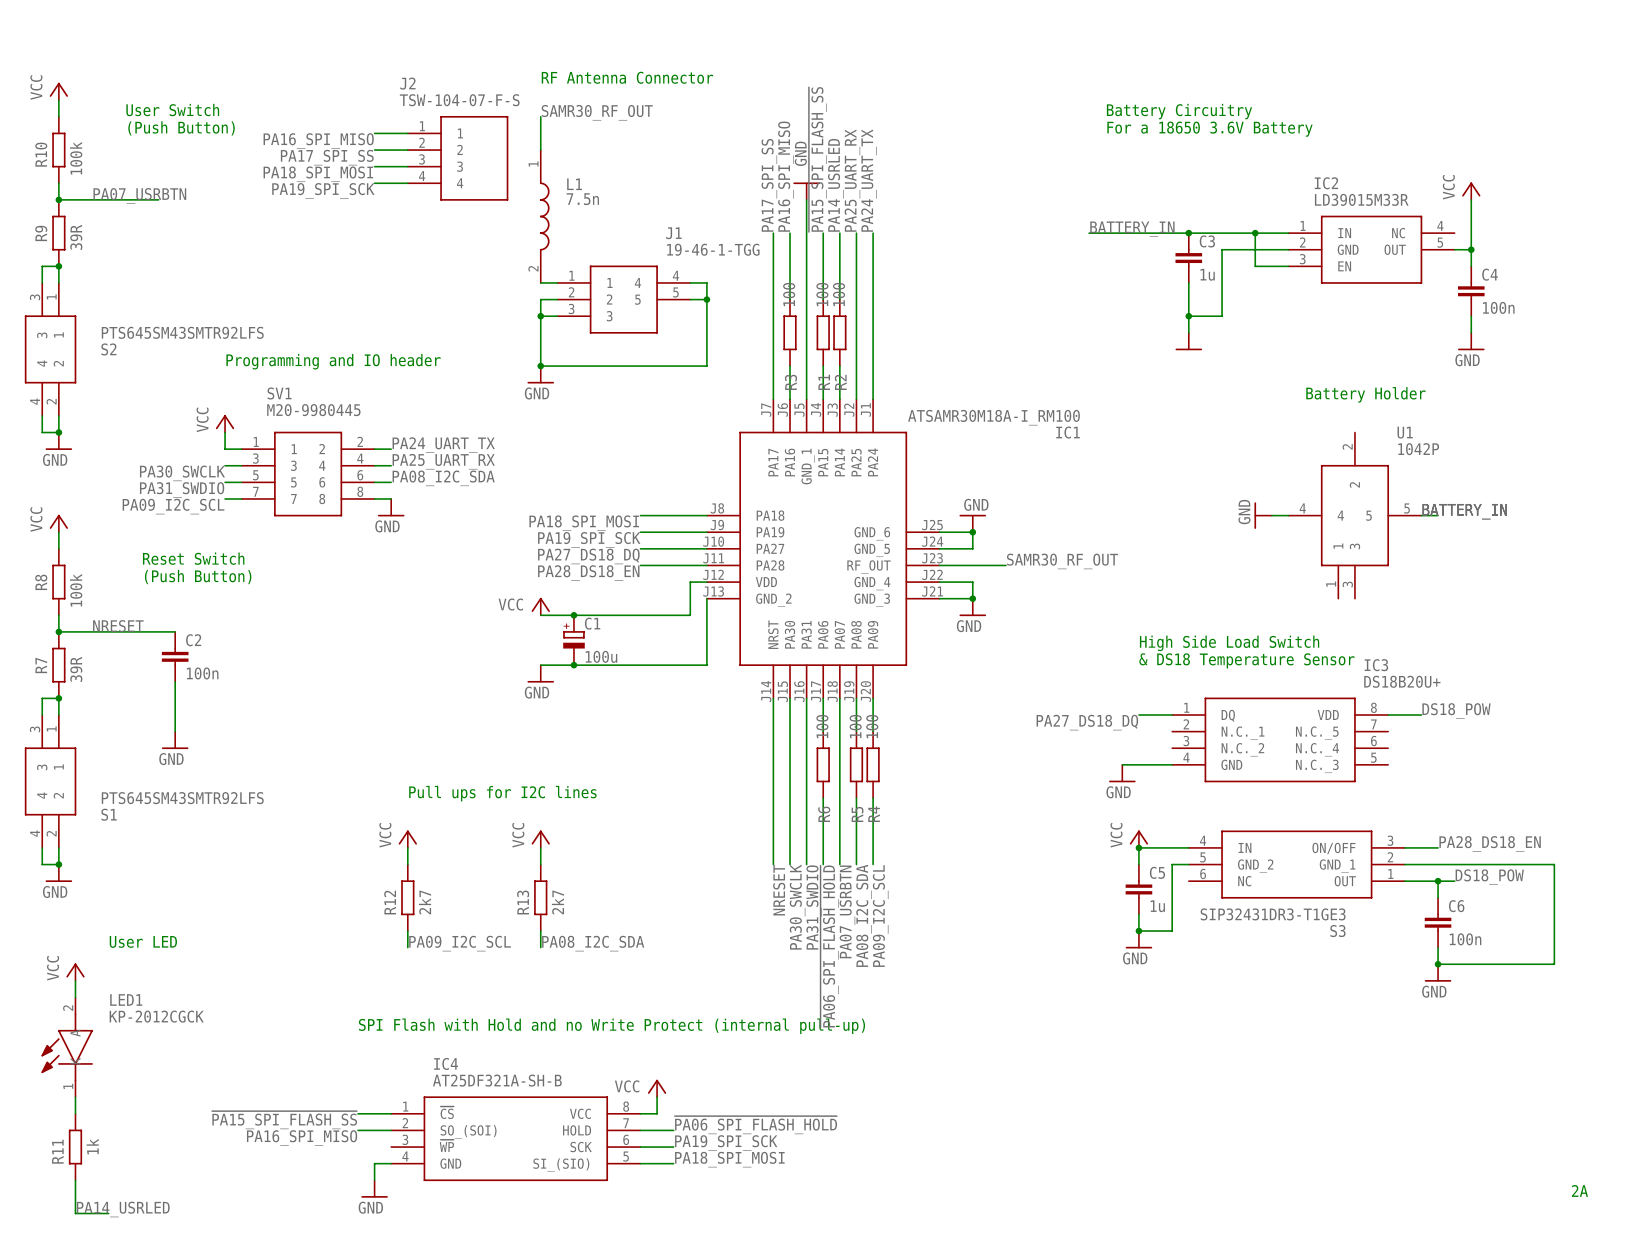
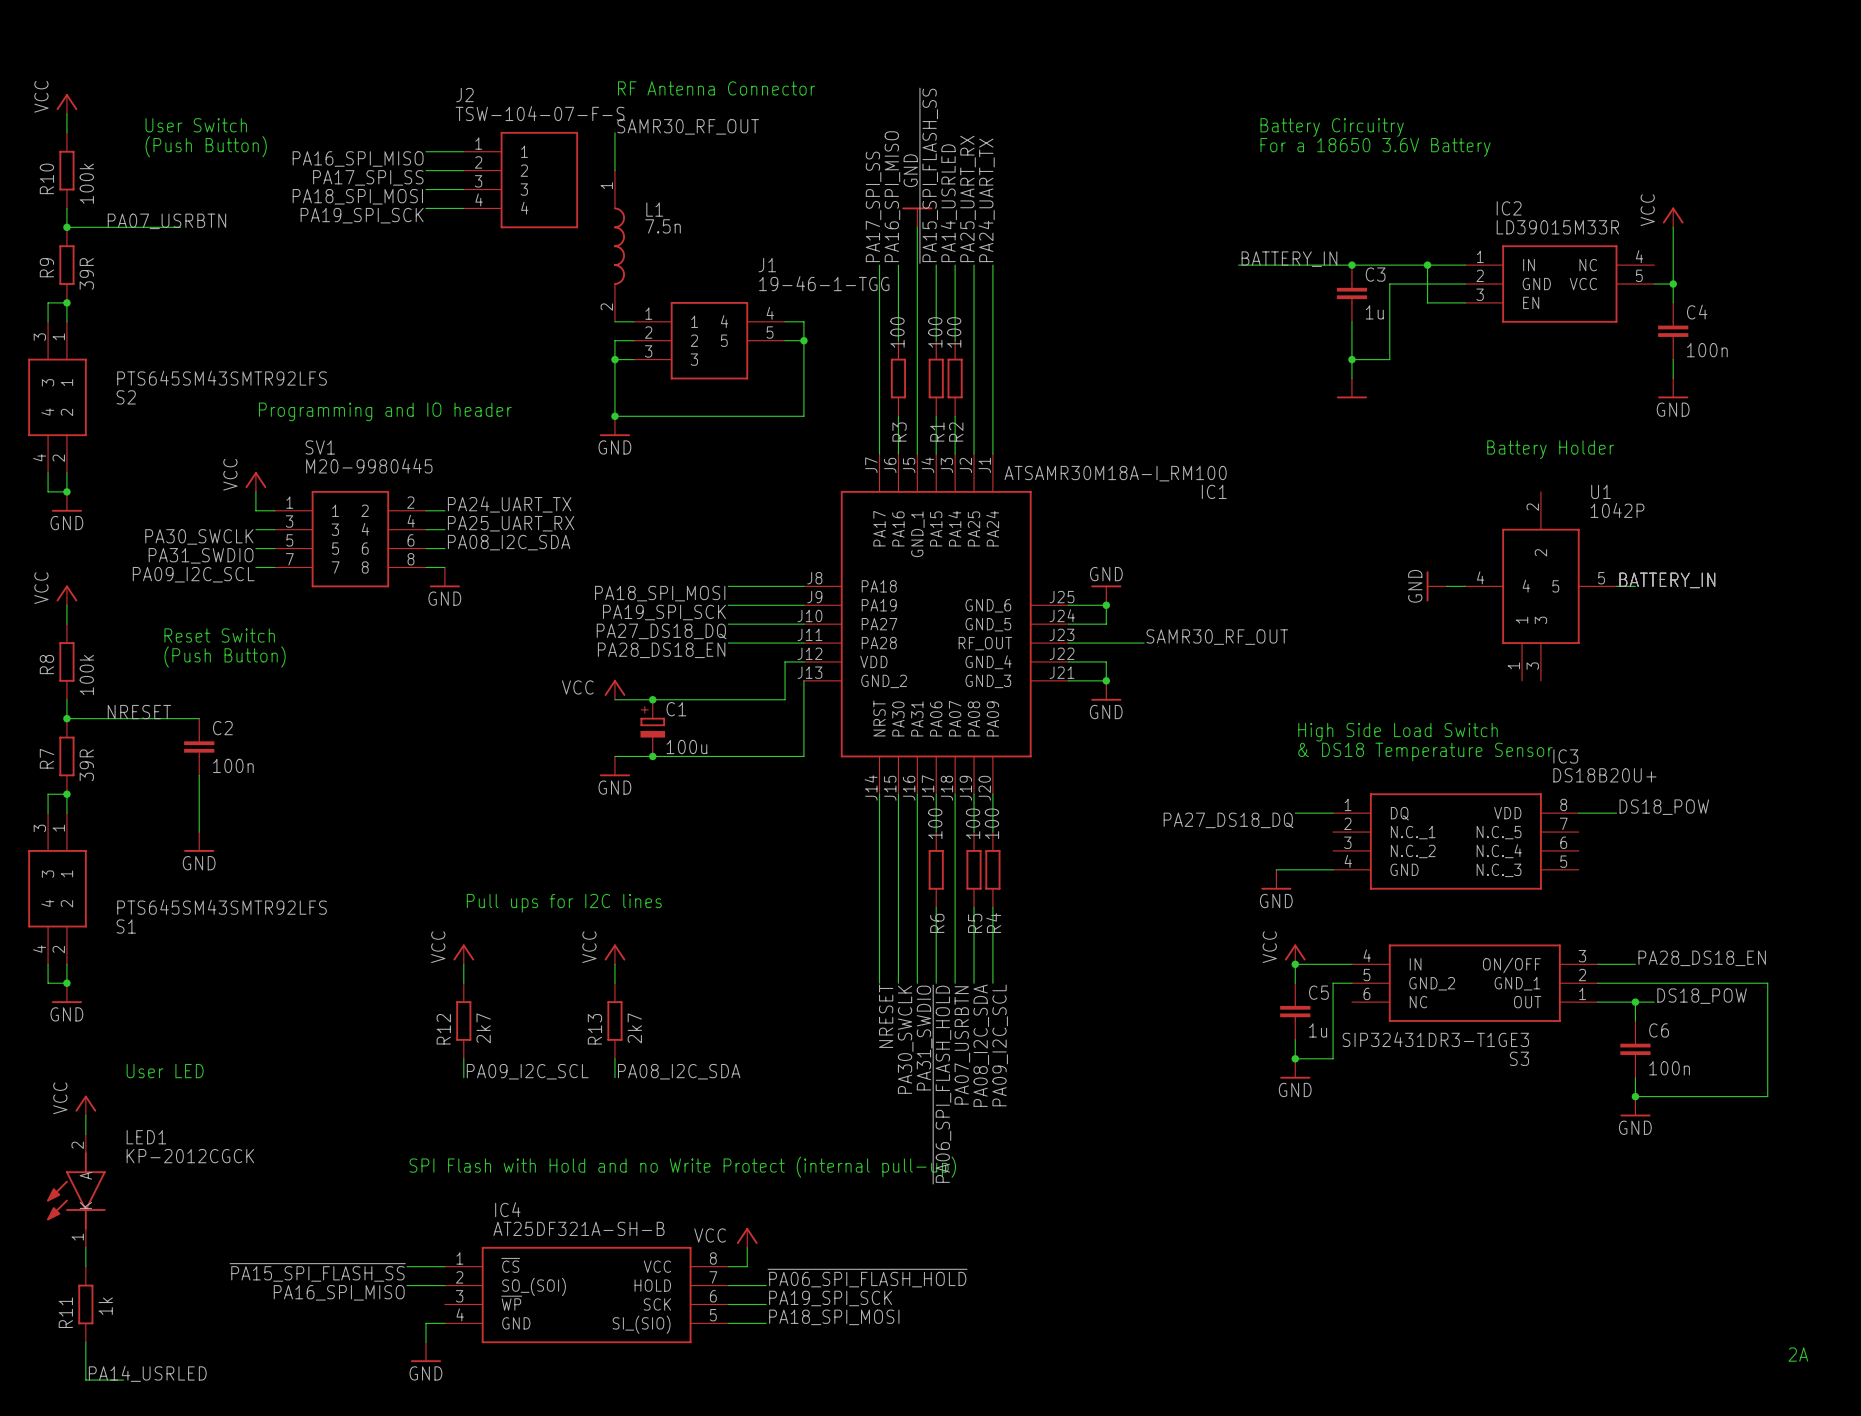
IC2 pin name: OUT (1395, 249) -> VCC (1583, 284)

